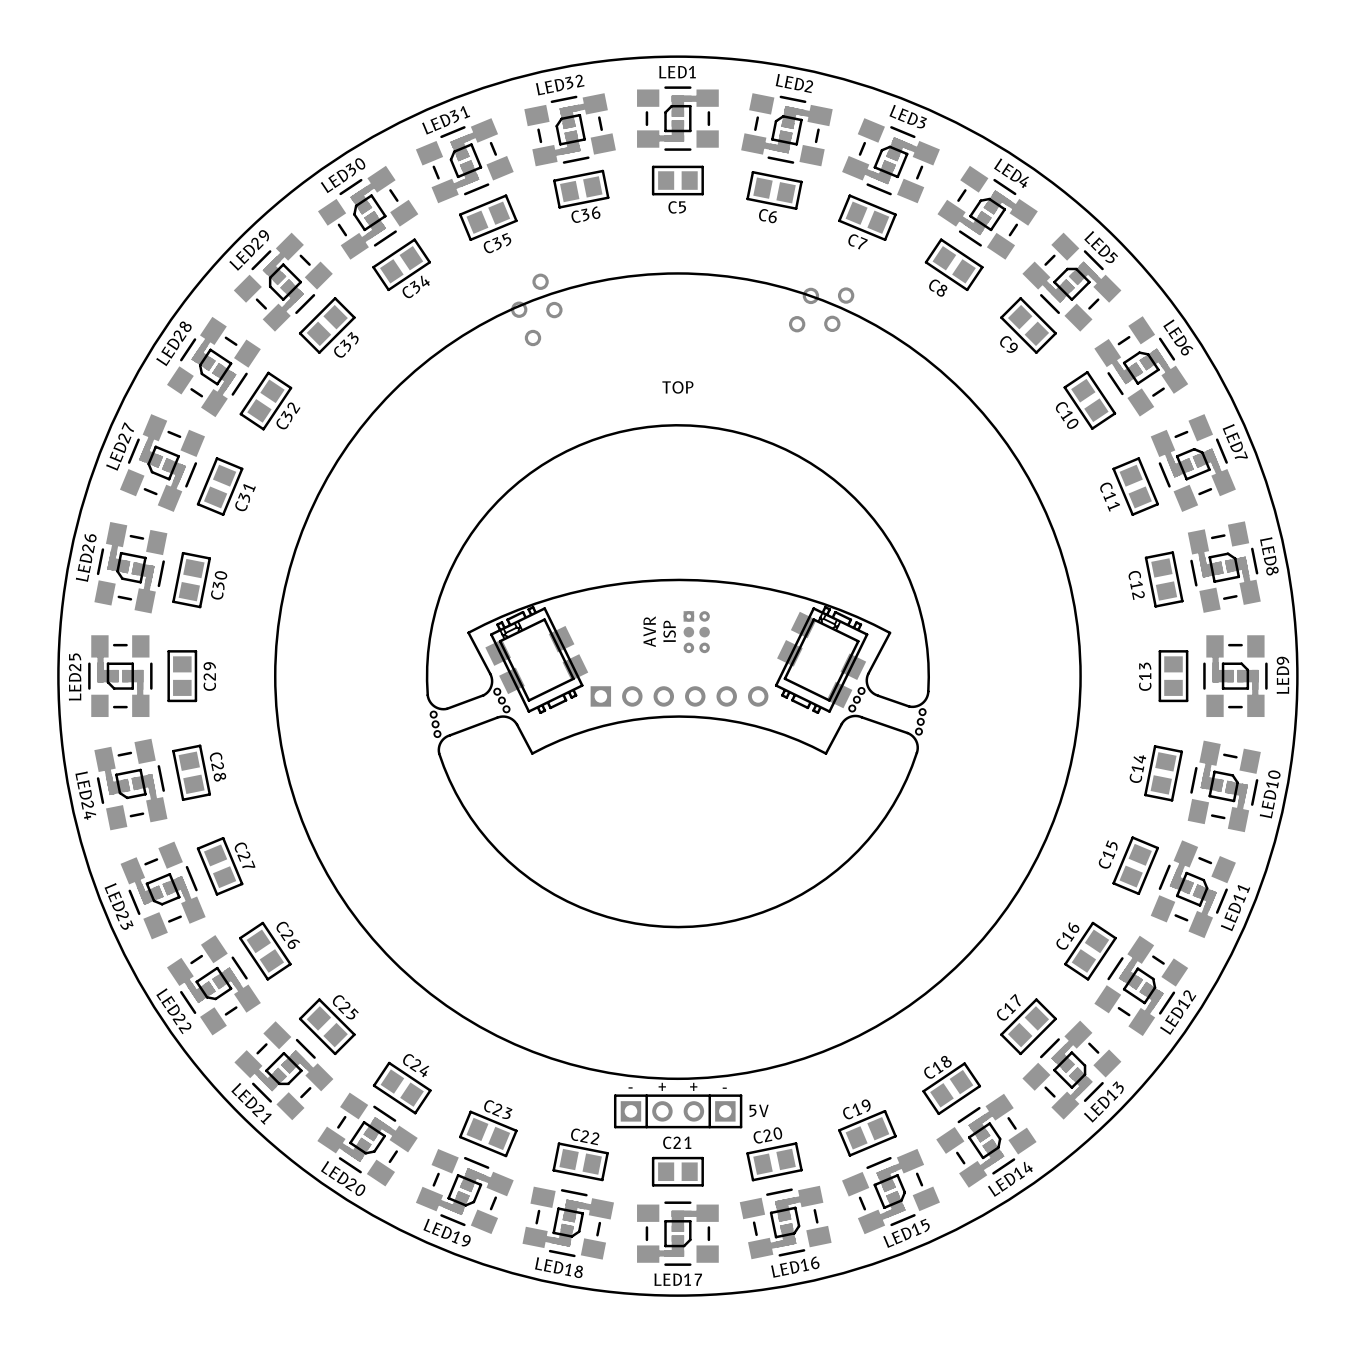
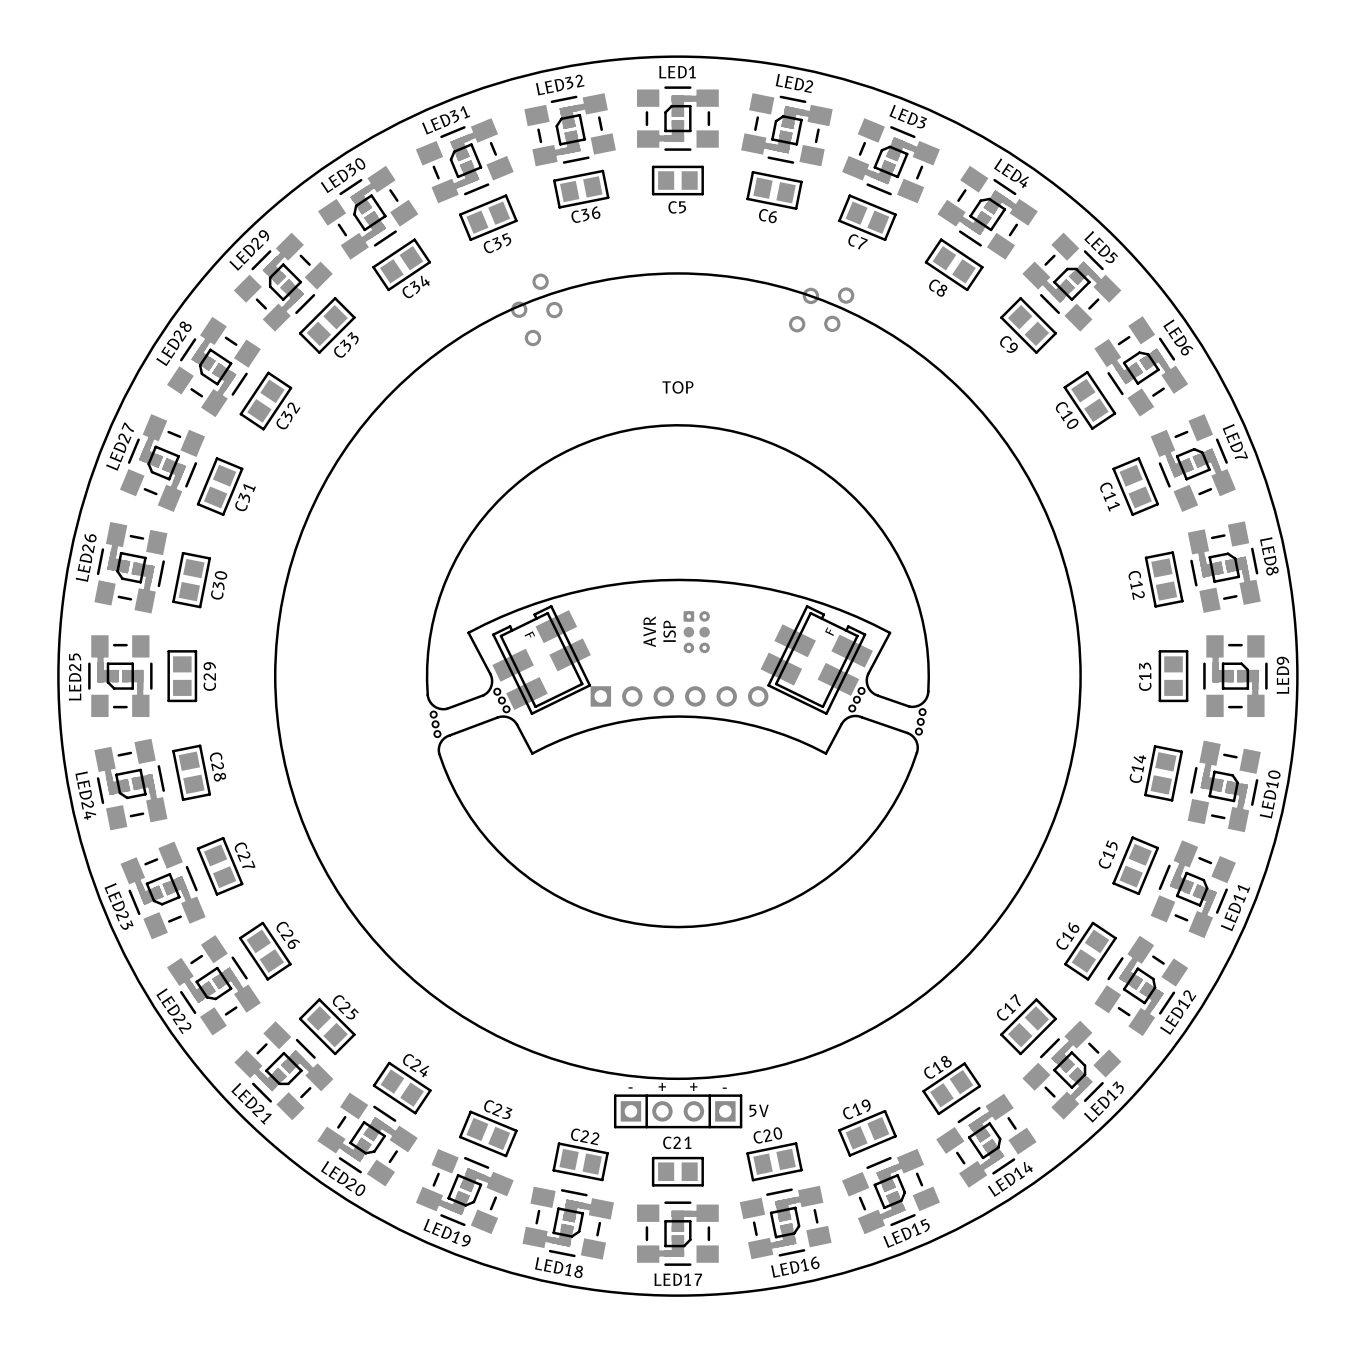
part footprint: [485, 605, 589, 715] -> [492, 605, 592, 715]
part footprint: [774, 605, 869, 715] -> [760, 605, 873, 715]

